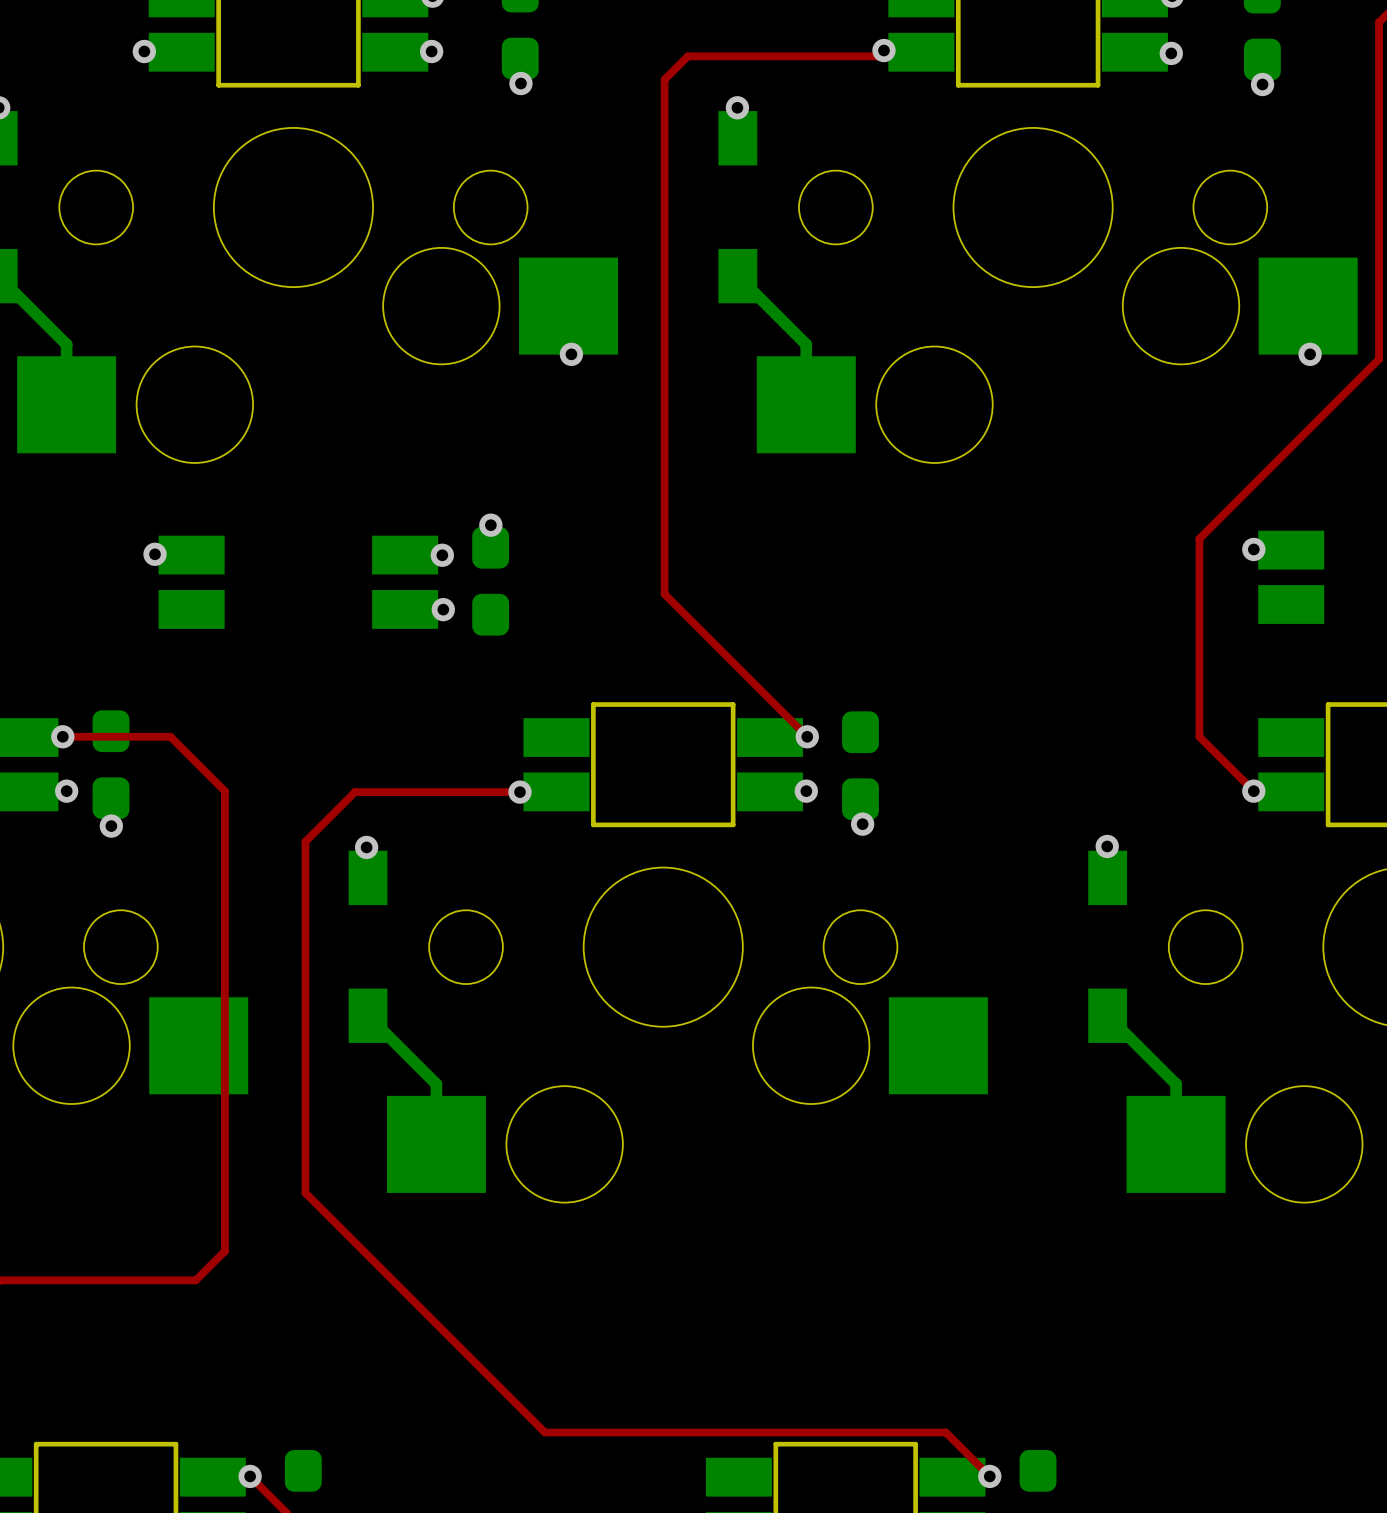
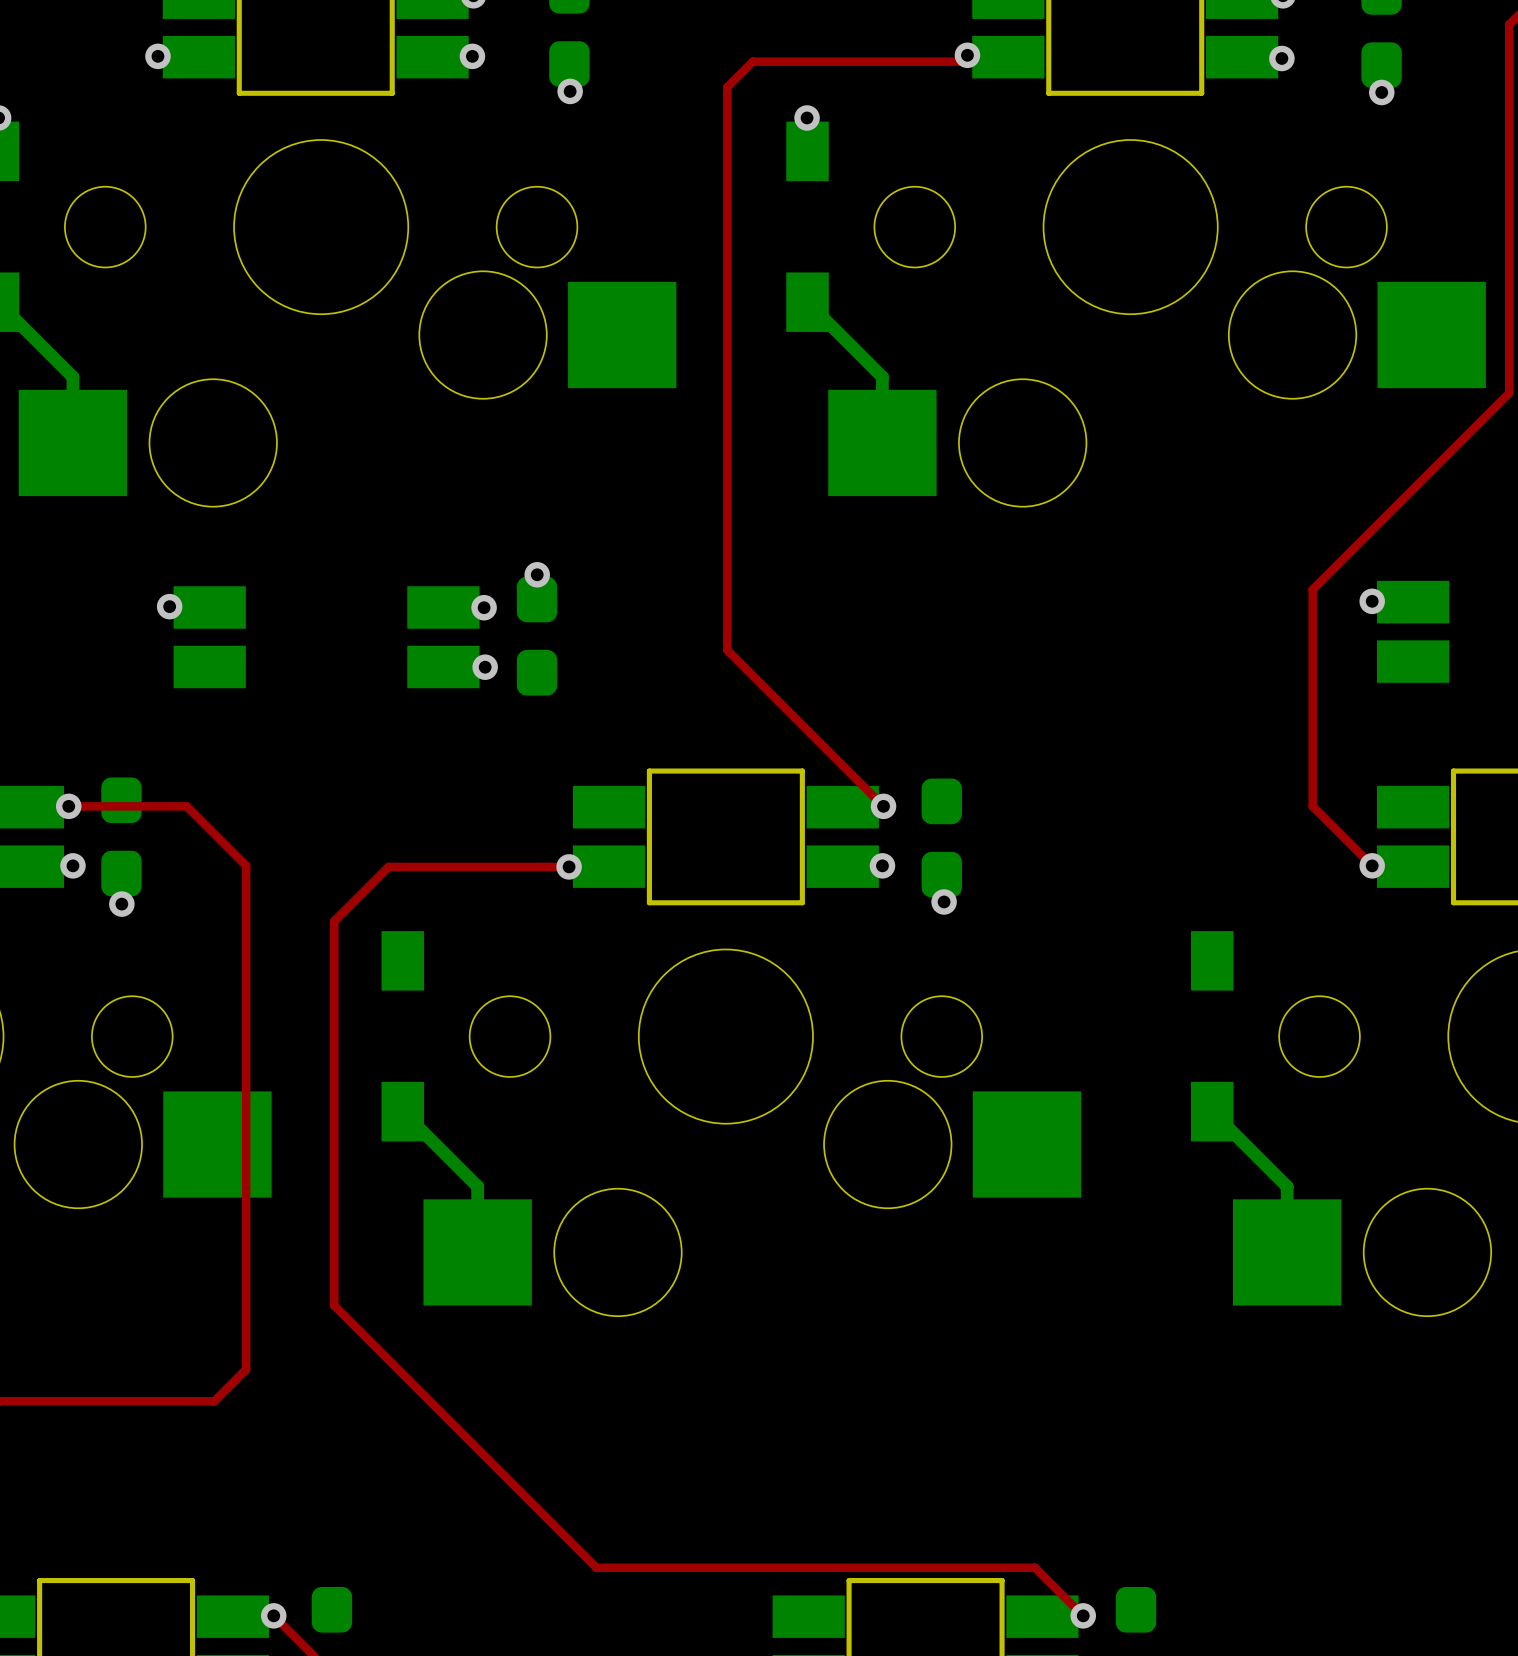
via: (571, 354) -> none
via: (1310, 354) -> none
via: (1107, 846) -> none
via: (366, 847) -> none

